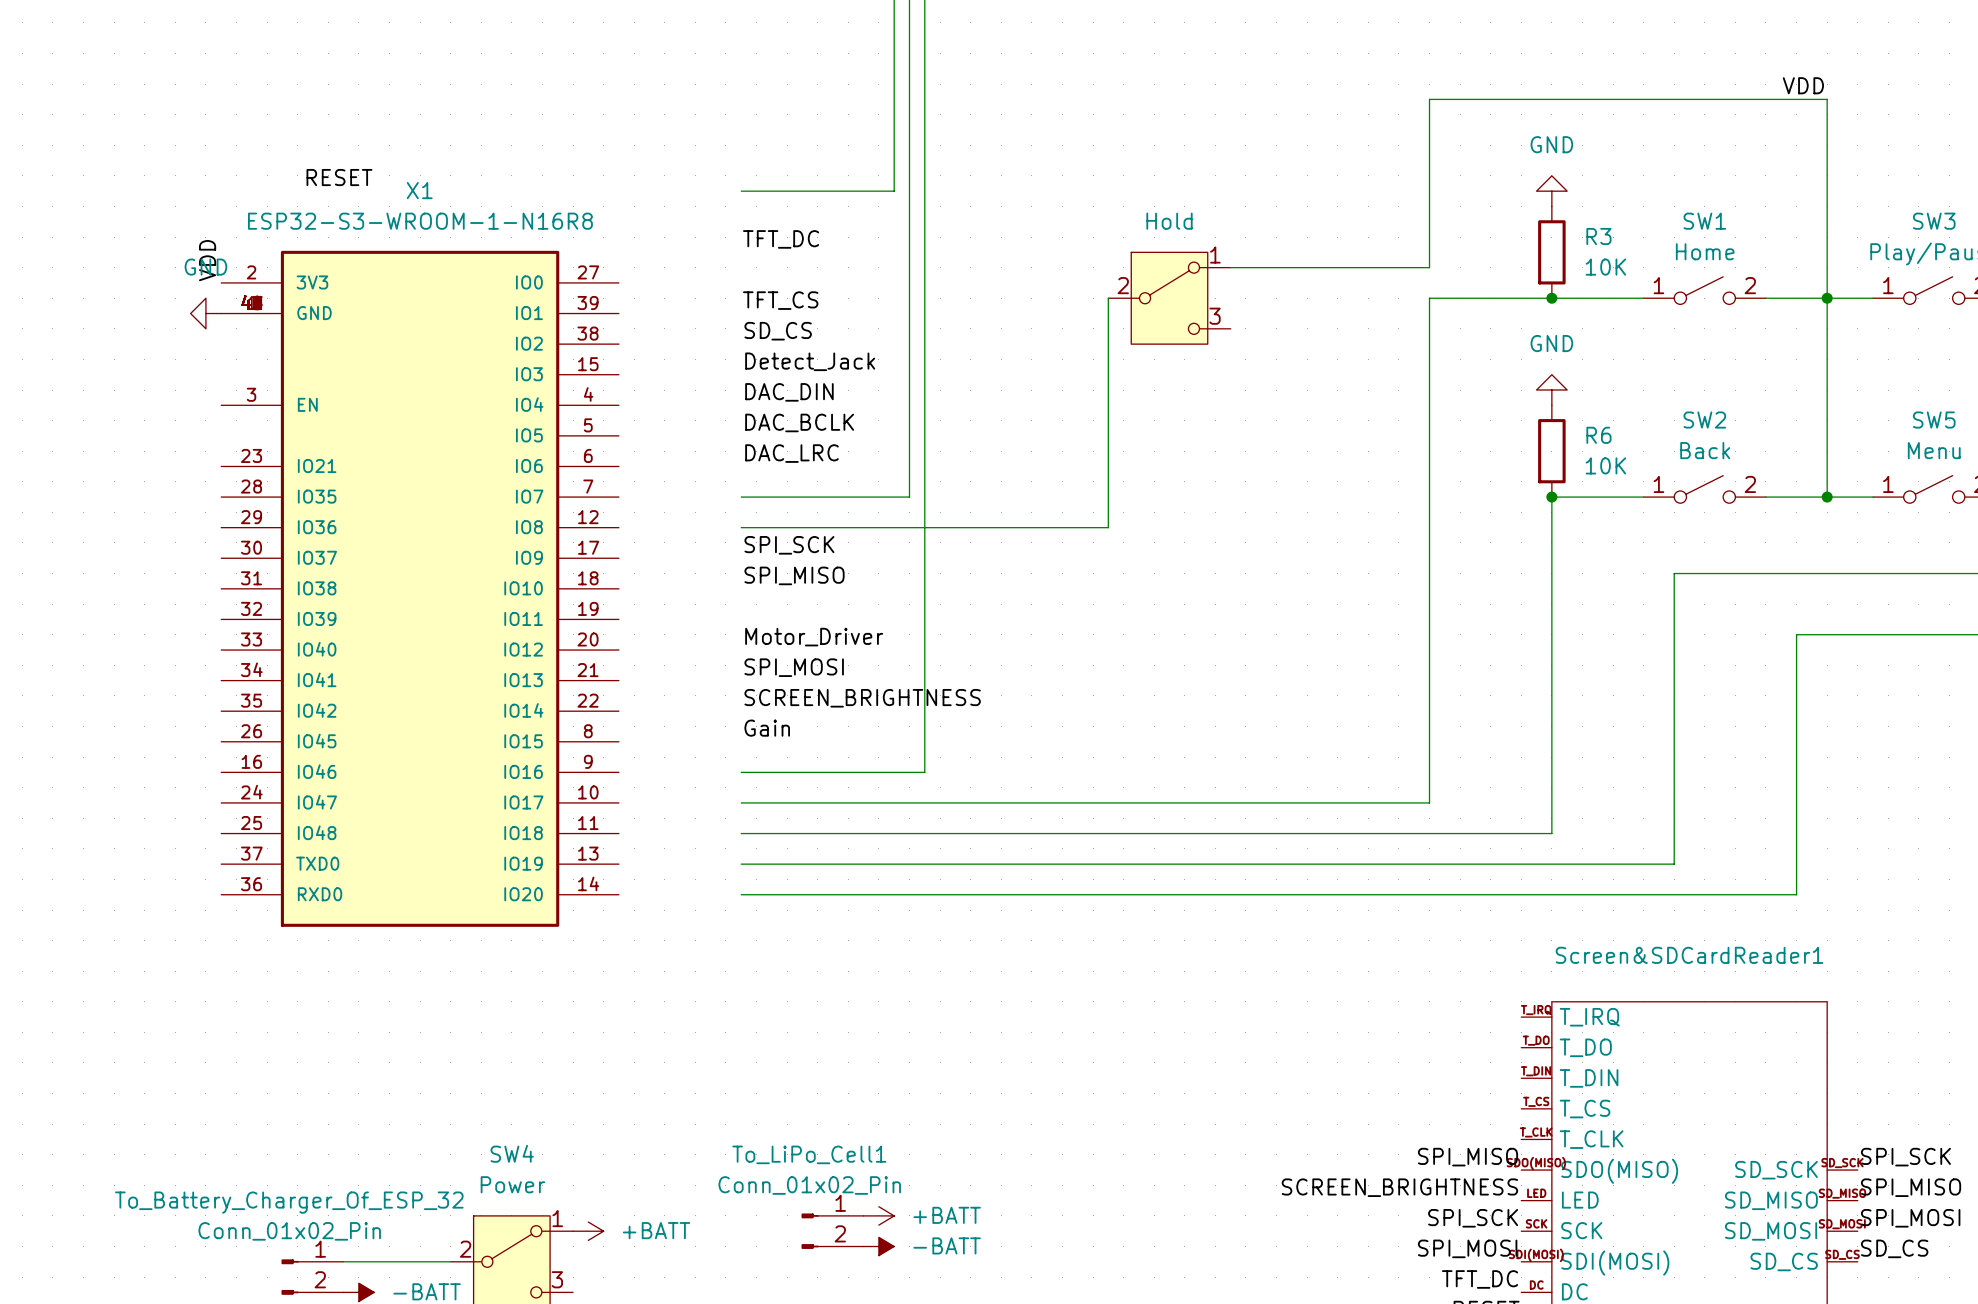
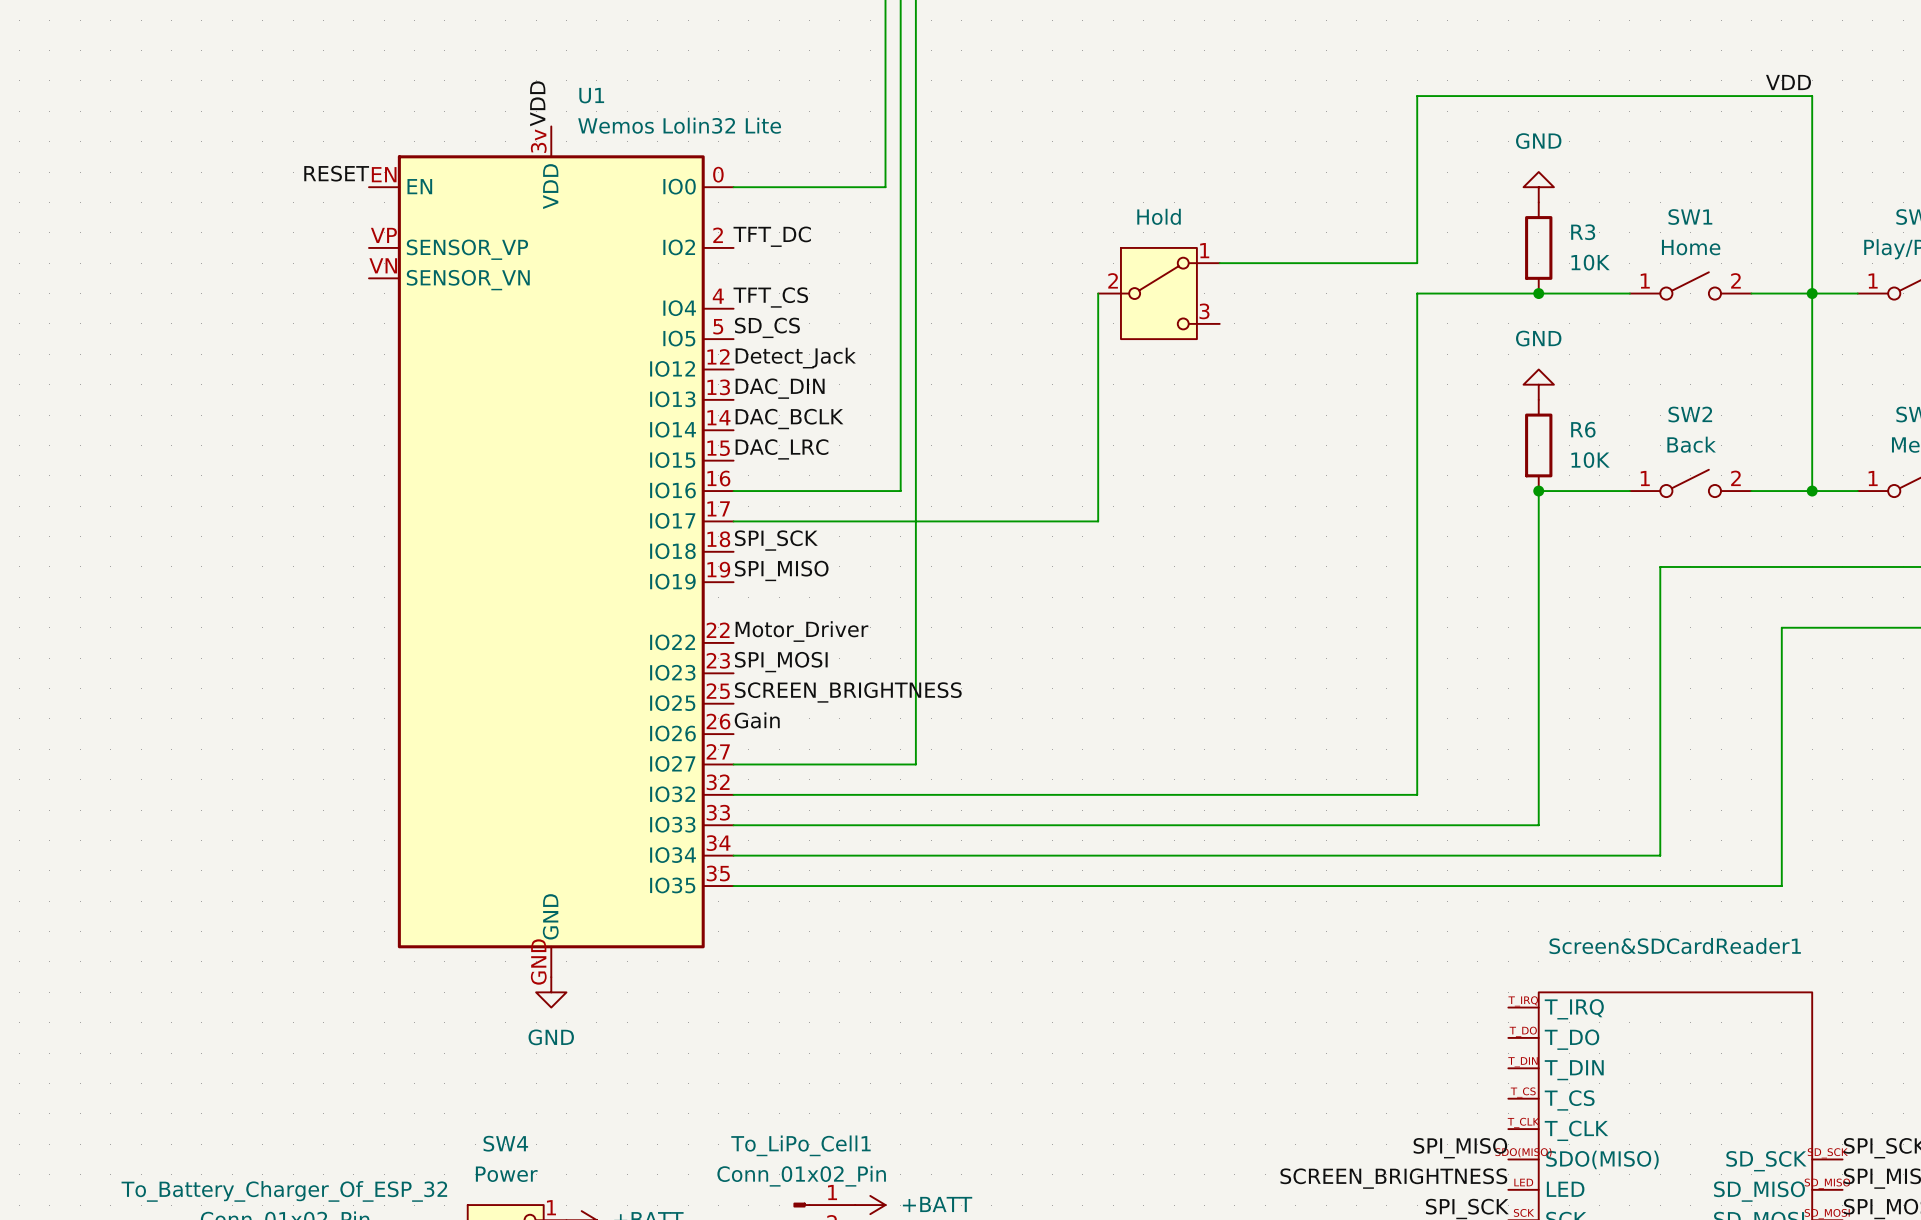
label: none -> VDD (537, 103)
label: VDD (207, 260) -> none
power symbol: GND (205, 313) -> none
U1: none -> Wemos Lolin32 Lite (551, 551)
X1: ESP32-S3-WROOM-1-N16R8 (420, 588) -> none
power symbol: none -> GND (551, 992)

